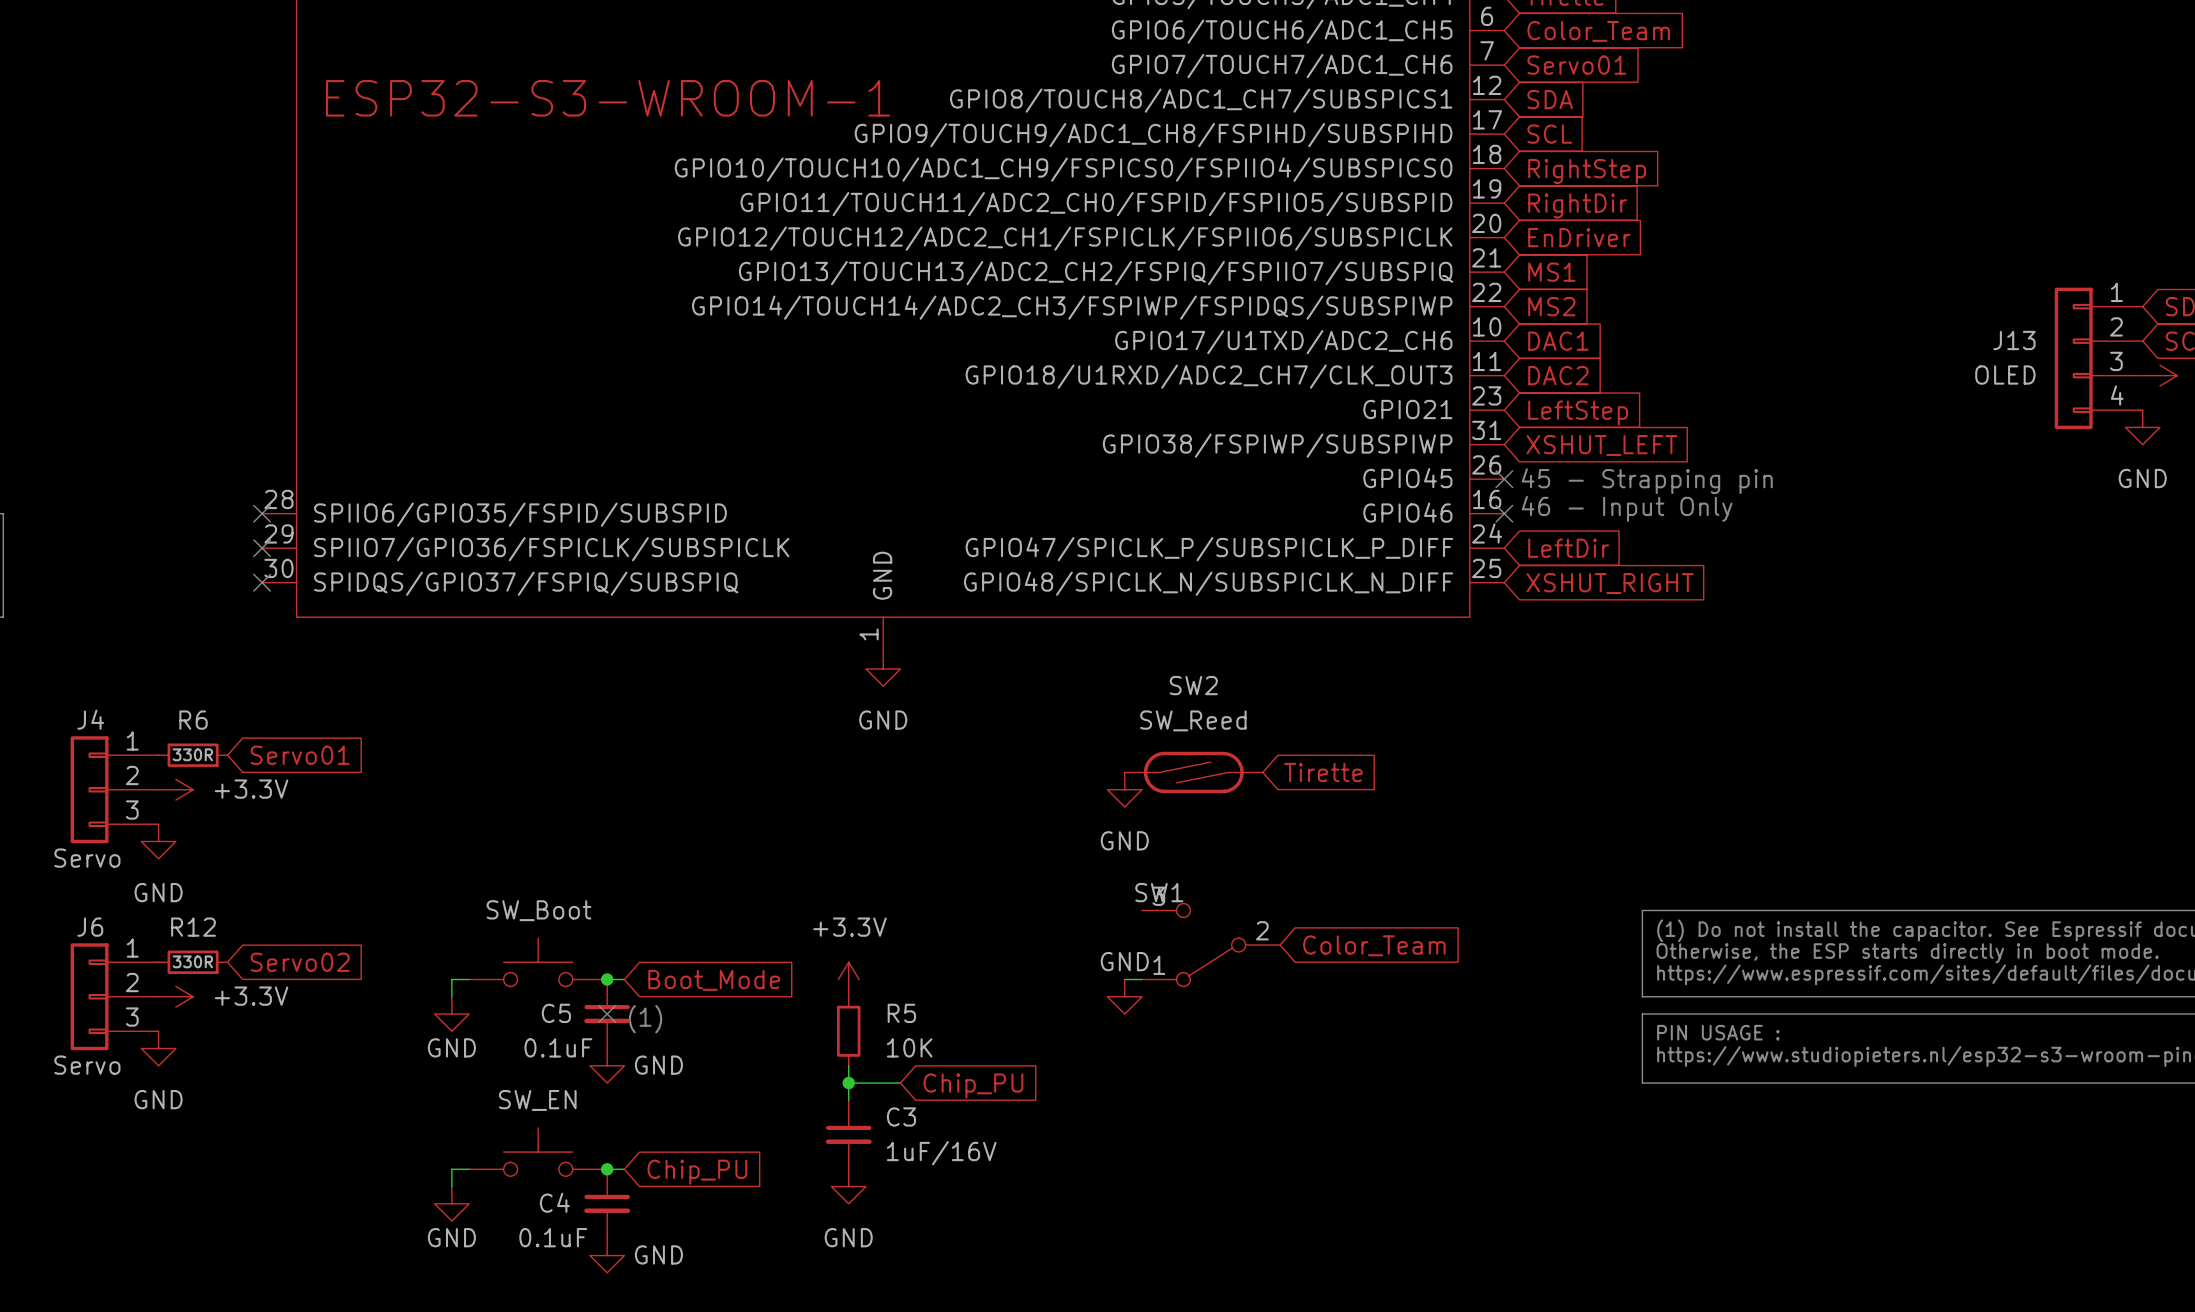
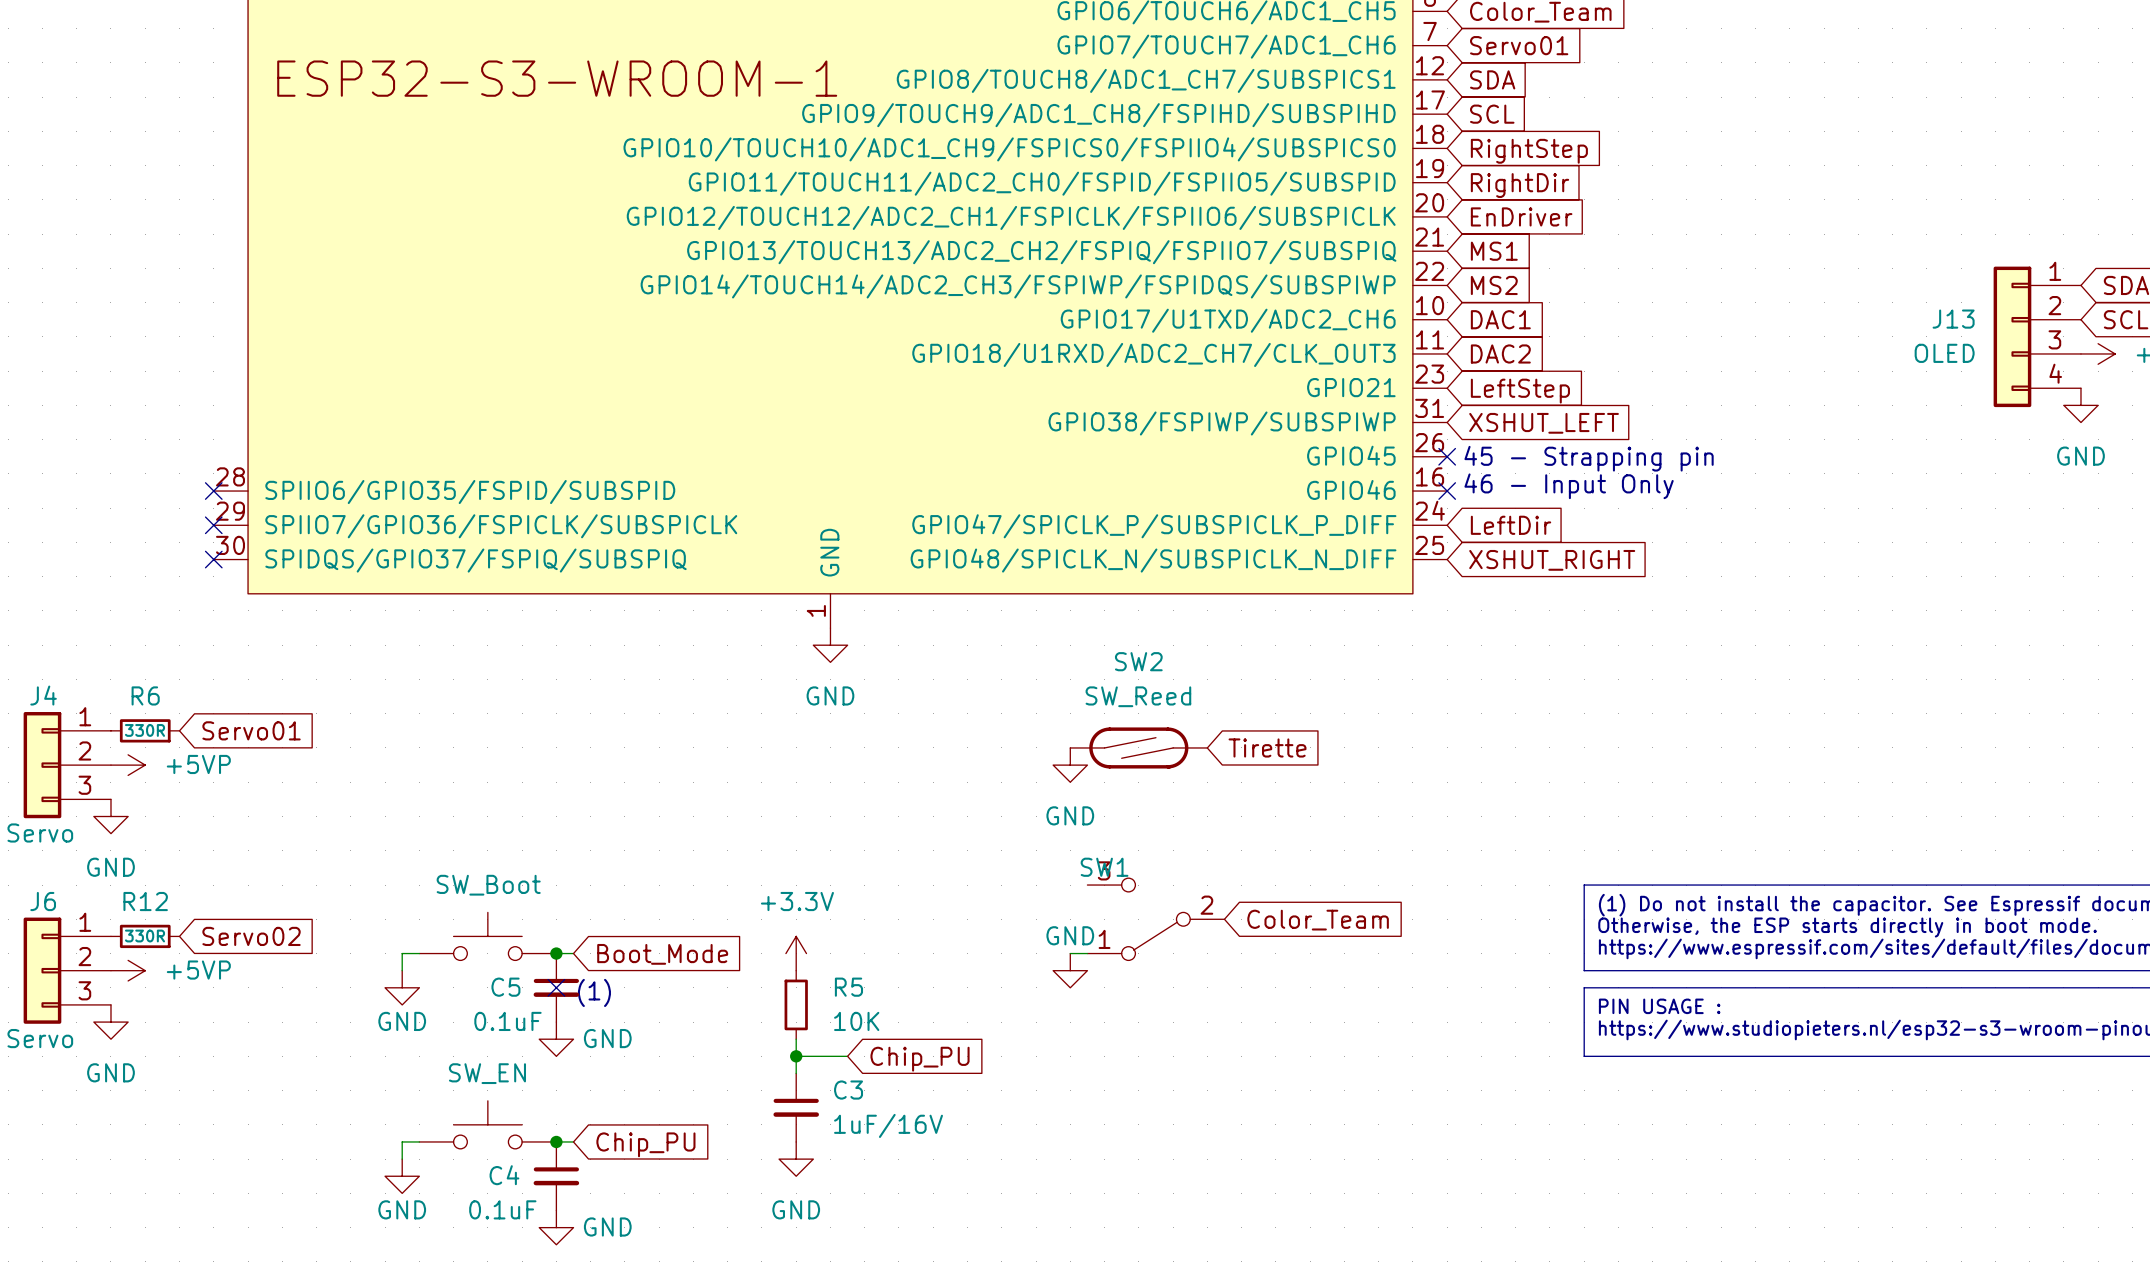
power symbol: +3.3V (175, 789) -> +5VP (128, 765)
power symbol: +3.3V (175, 996) -> +5VP (128, 970)

